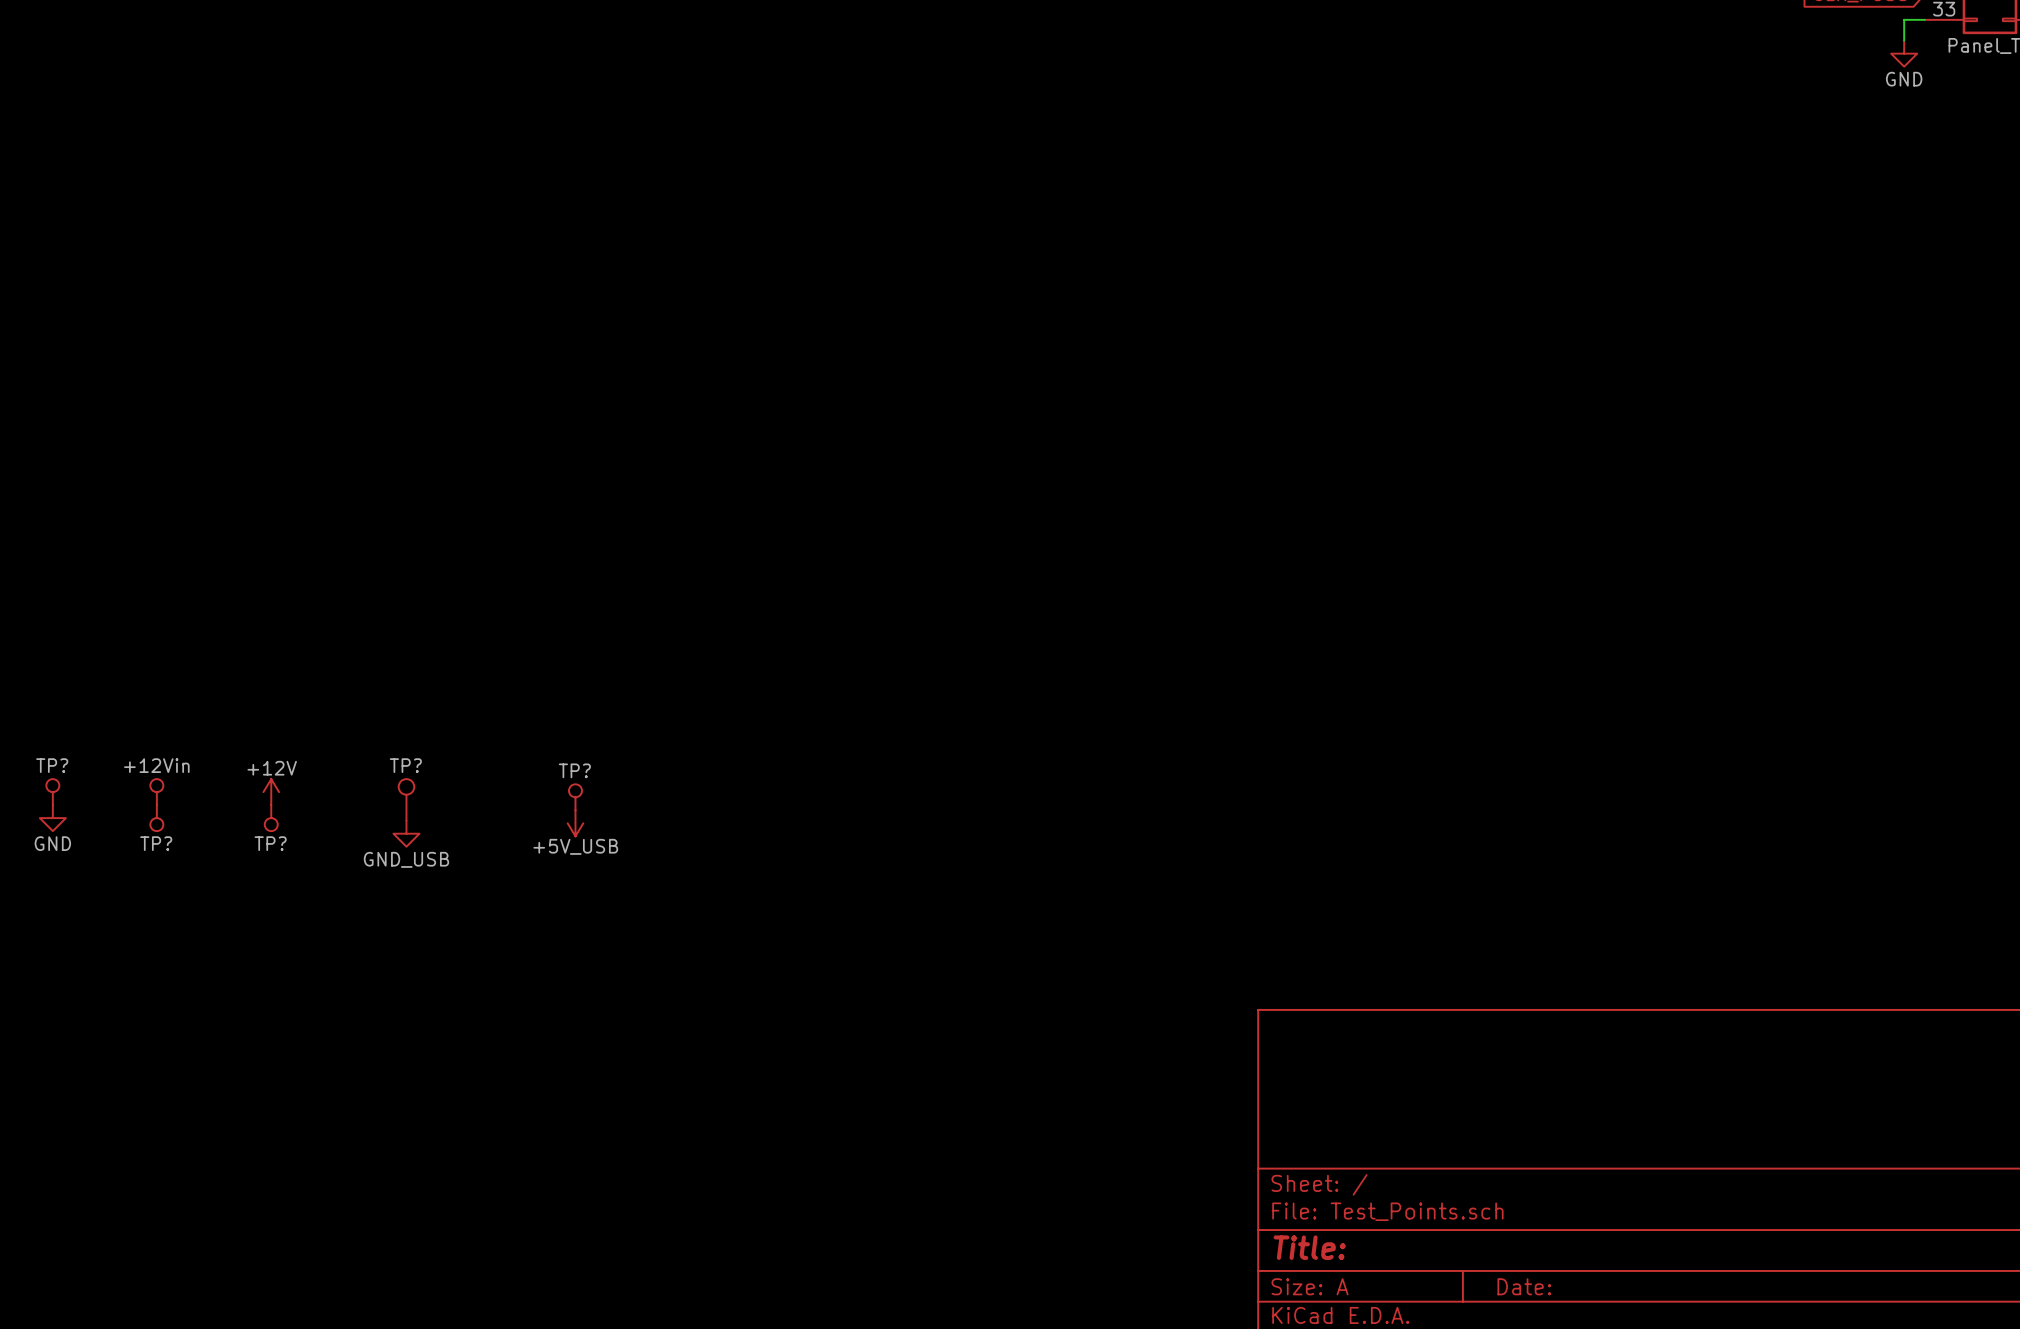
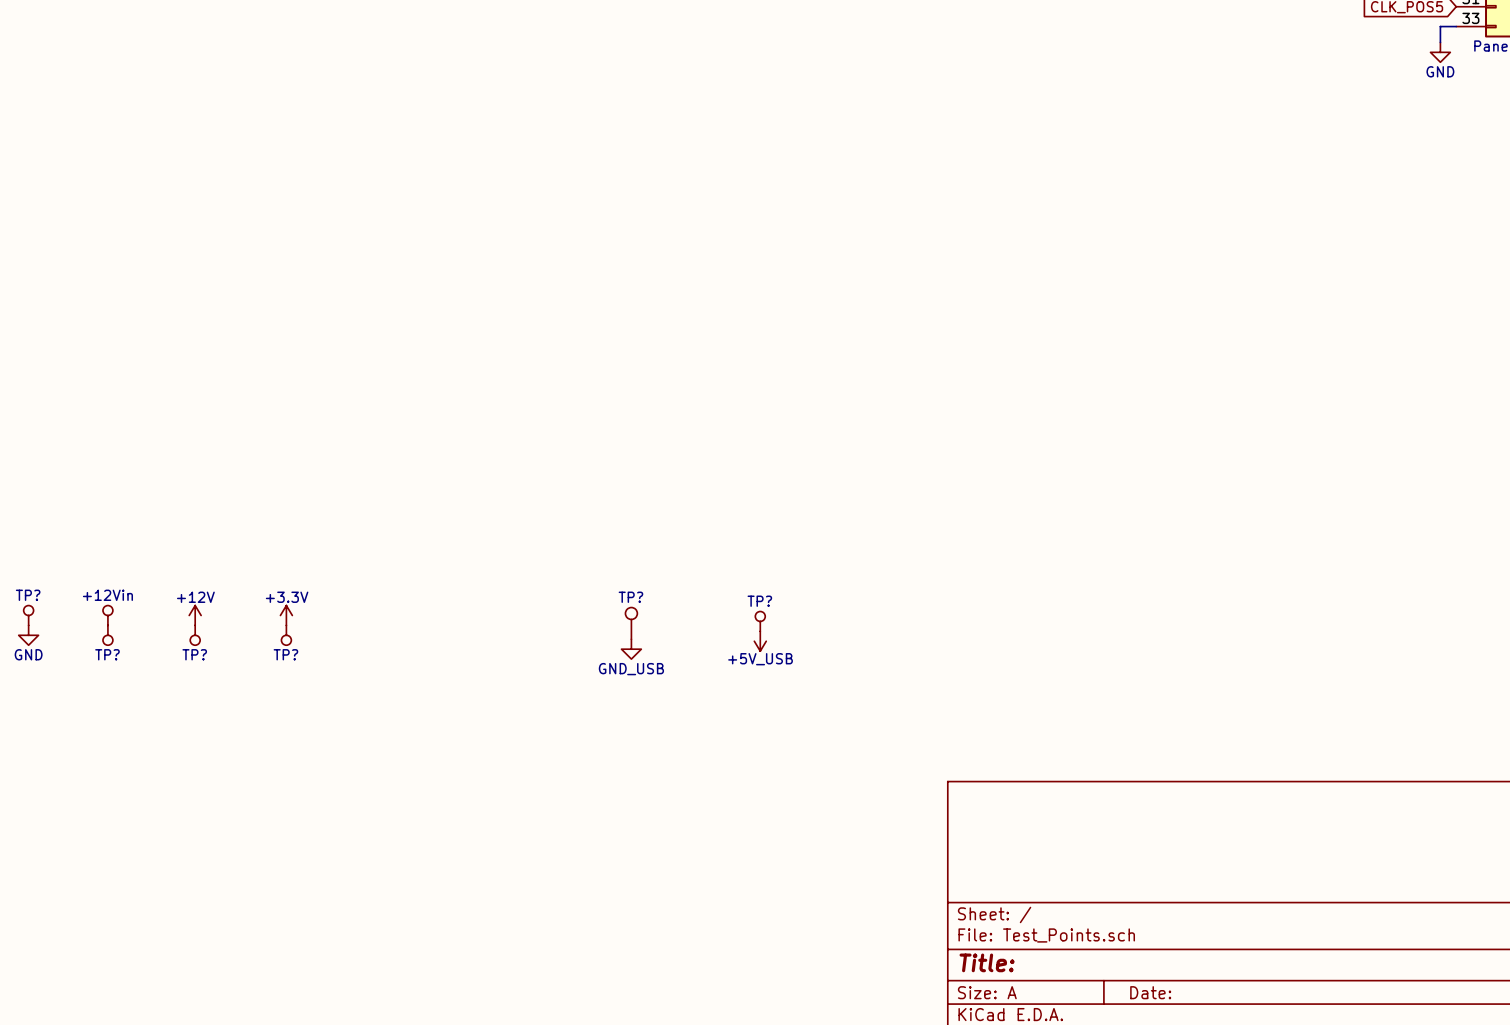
power symbol: none -> +3.3V (286, 615)
TP? rotation: 0° (575, 797) -> 180° (286, 635)
TP? position: (575, 797) -> (286, 635)
TP?: (406, 799) -> none
TP?: none -> (760, 621)
TP?: none -> (631, 623)
power symbol: +5V_USB (575, 823) -> none
power symbol: none -> +5V_USB (760, 641)
power symbol: GND_USB (406, 833) -> none
power symbol: none -> GND_USB (631, 649)

